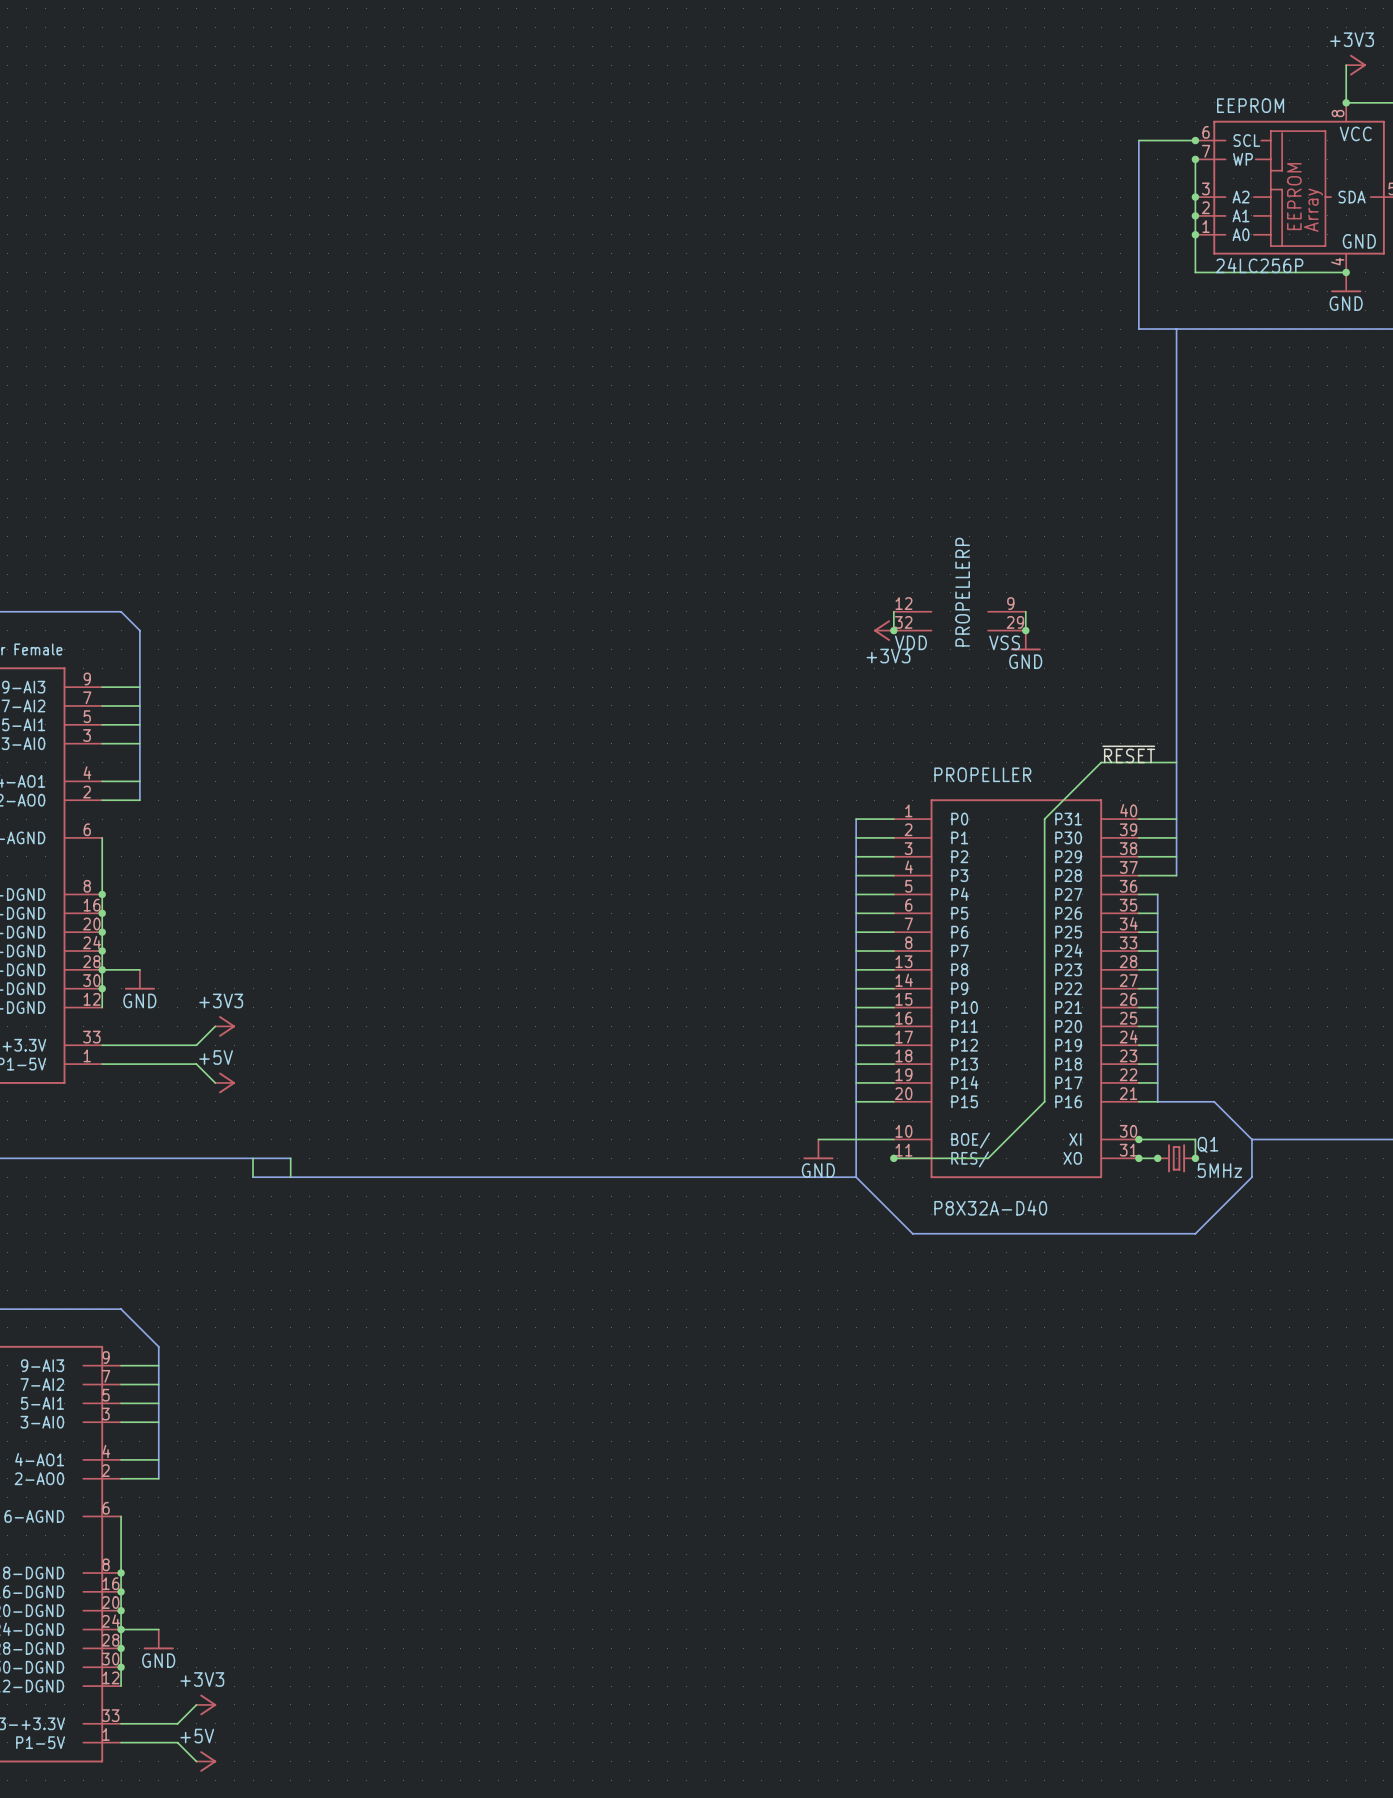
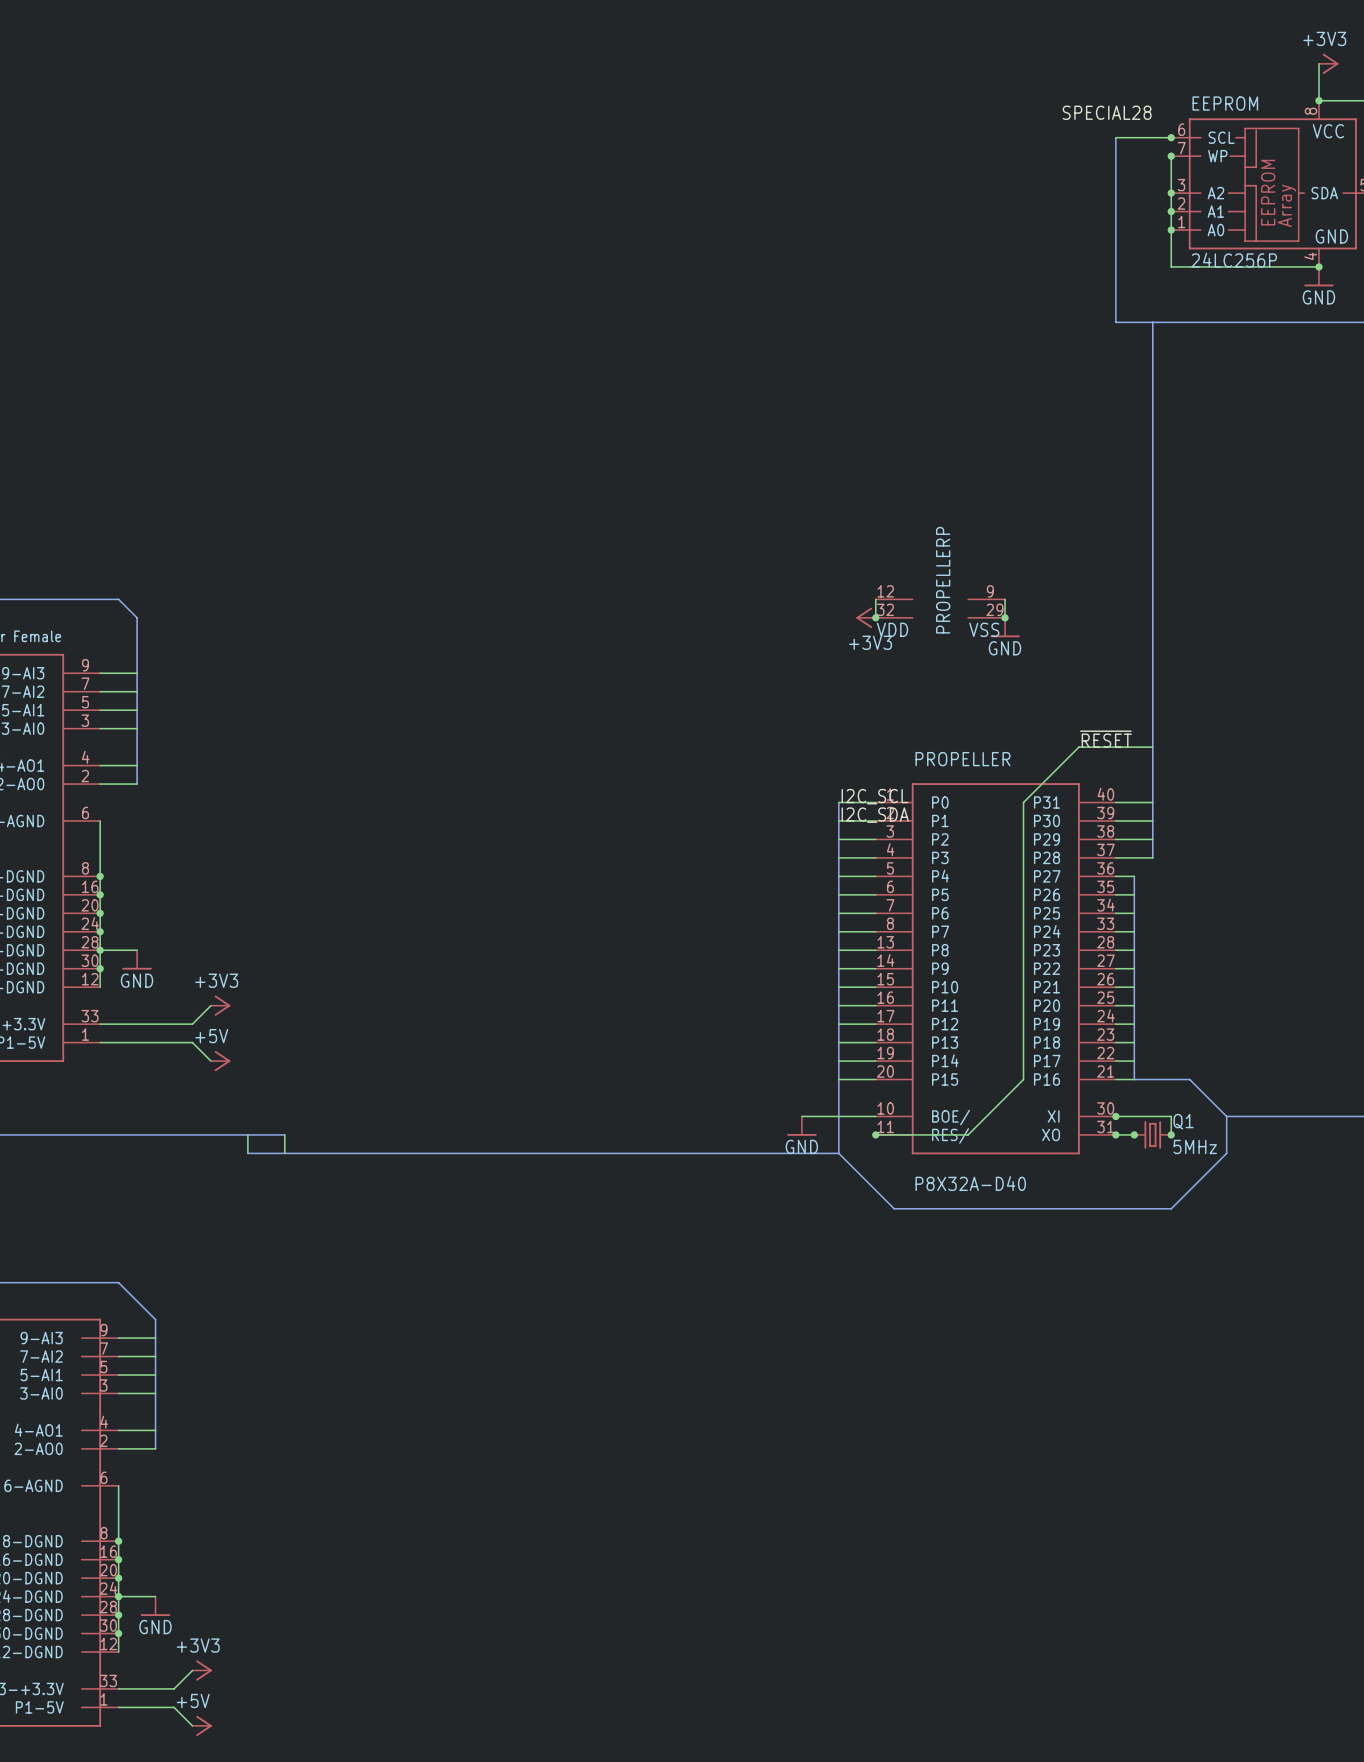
label: none -> SPECIAL28 (1107, 112)
label: none -> I2C_SCL (874, 796)
label: none -> I2C_SDA (875, 815)

